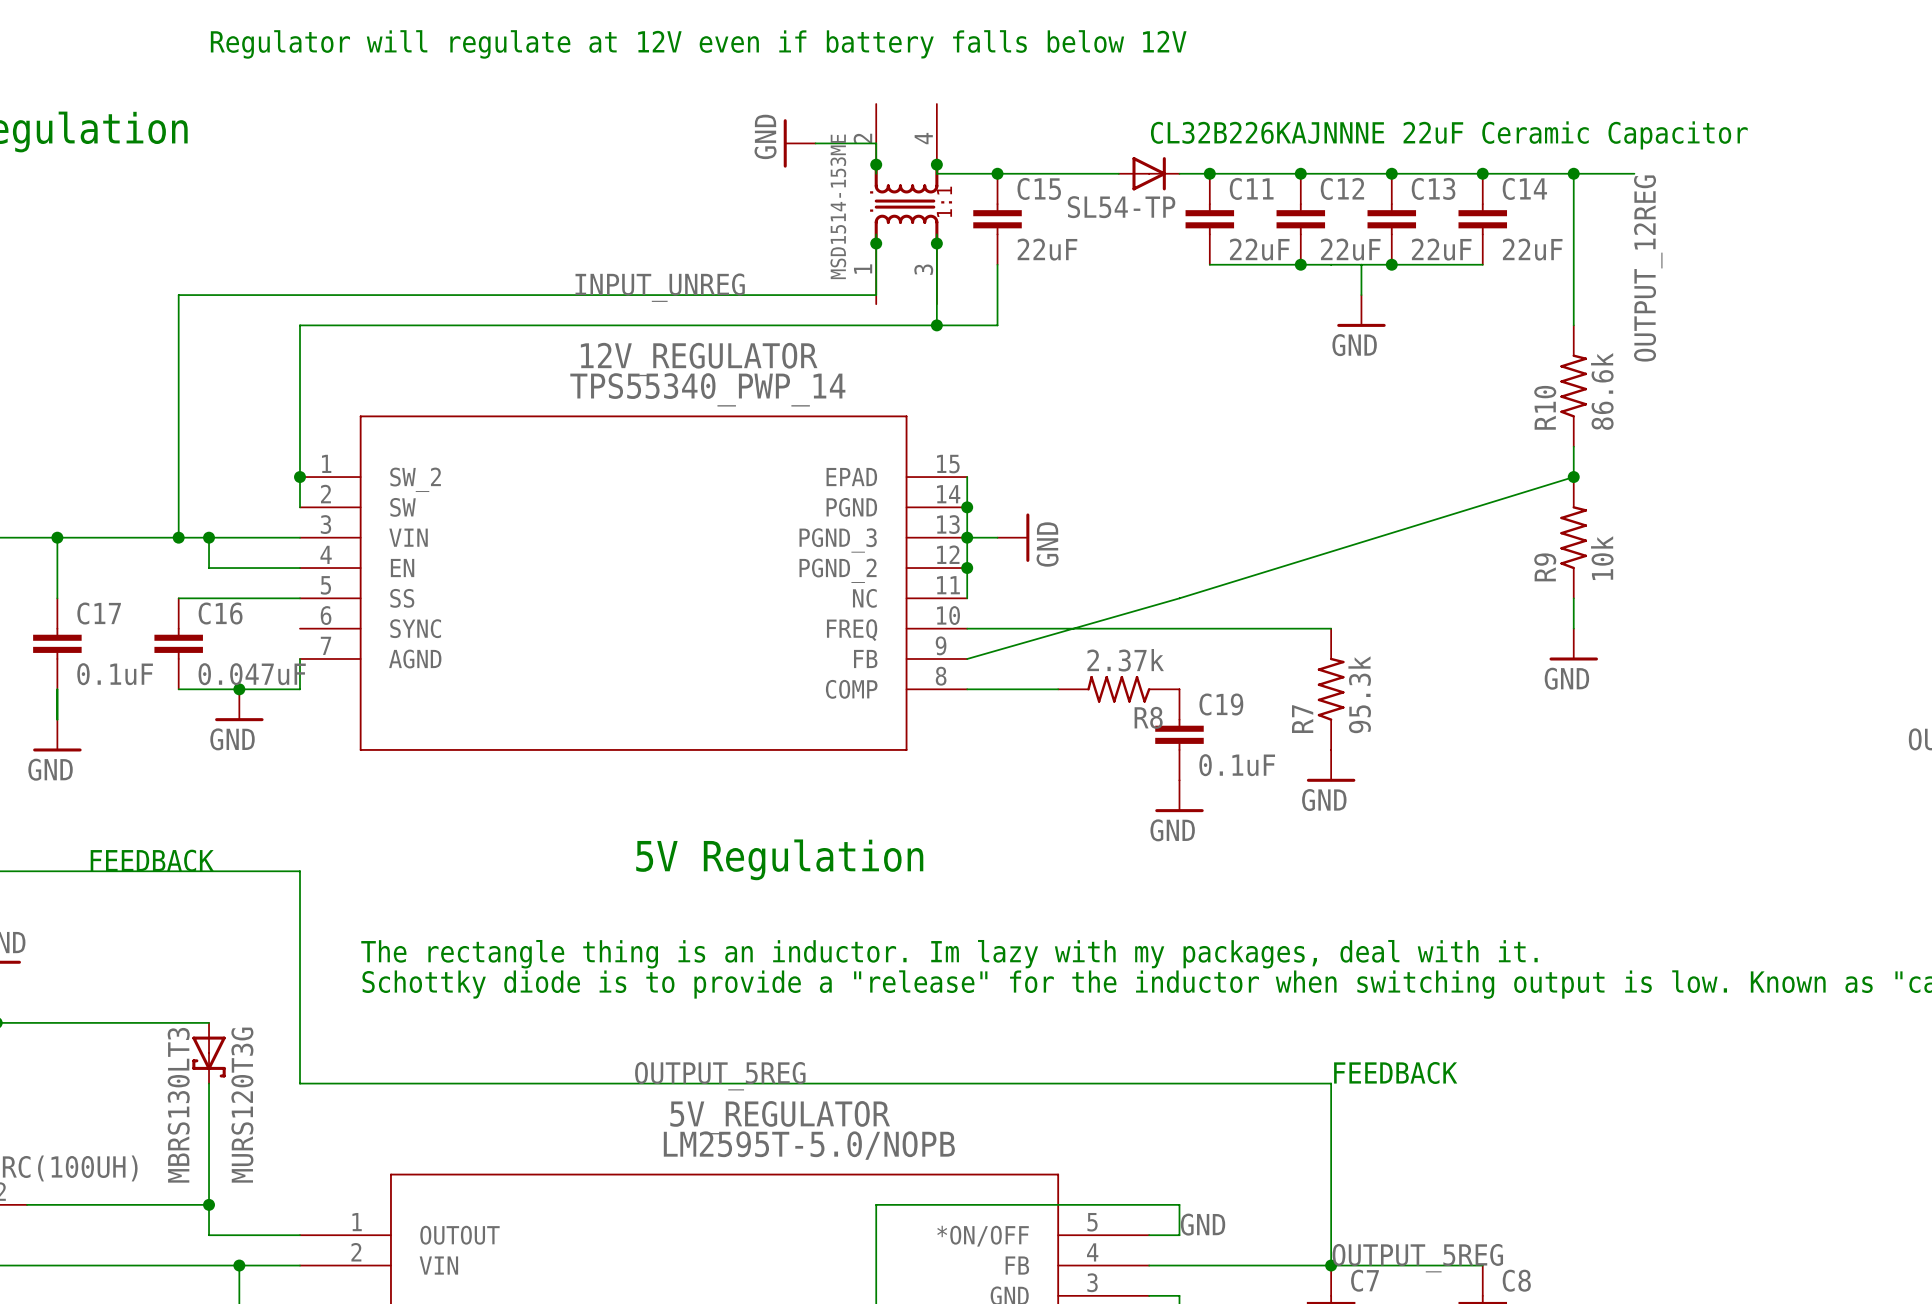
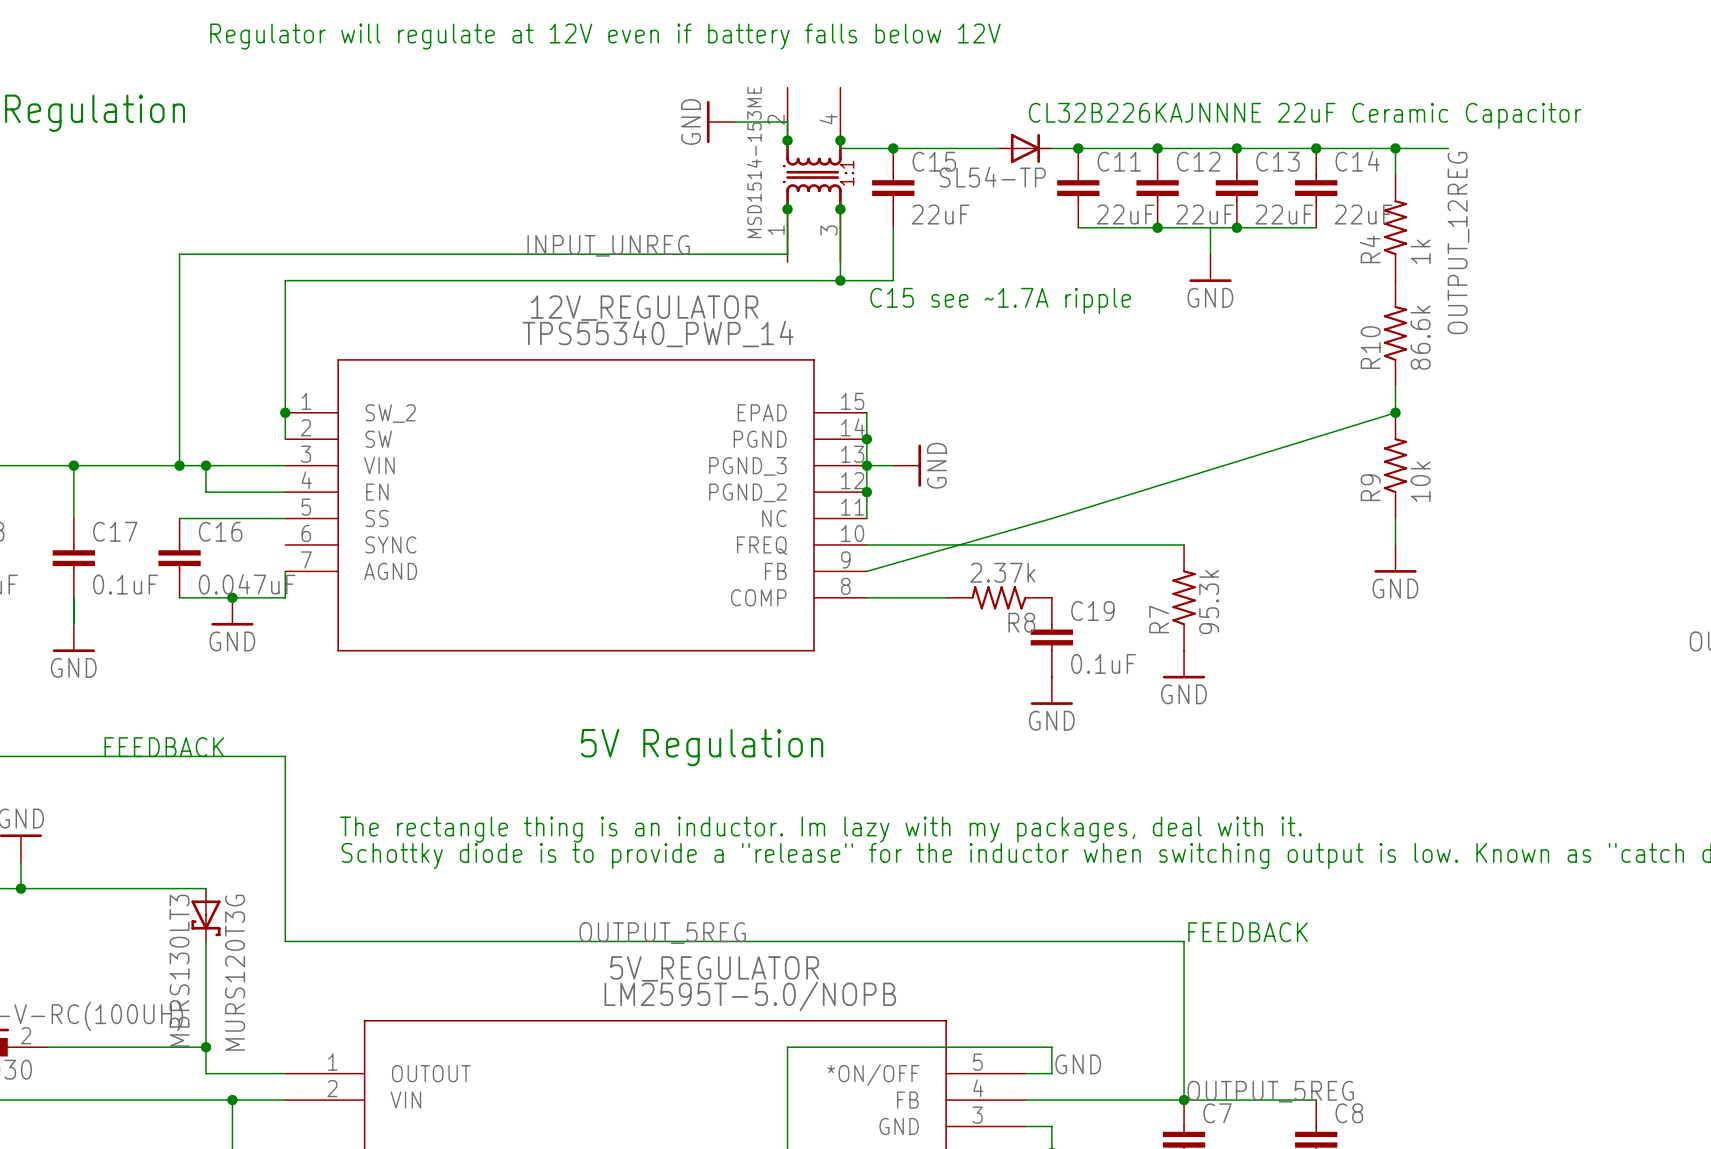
R4: none -> 1k (1395, 227)
text: none -> C15 see ~1.7A ripple (1000, 300)

